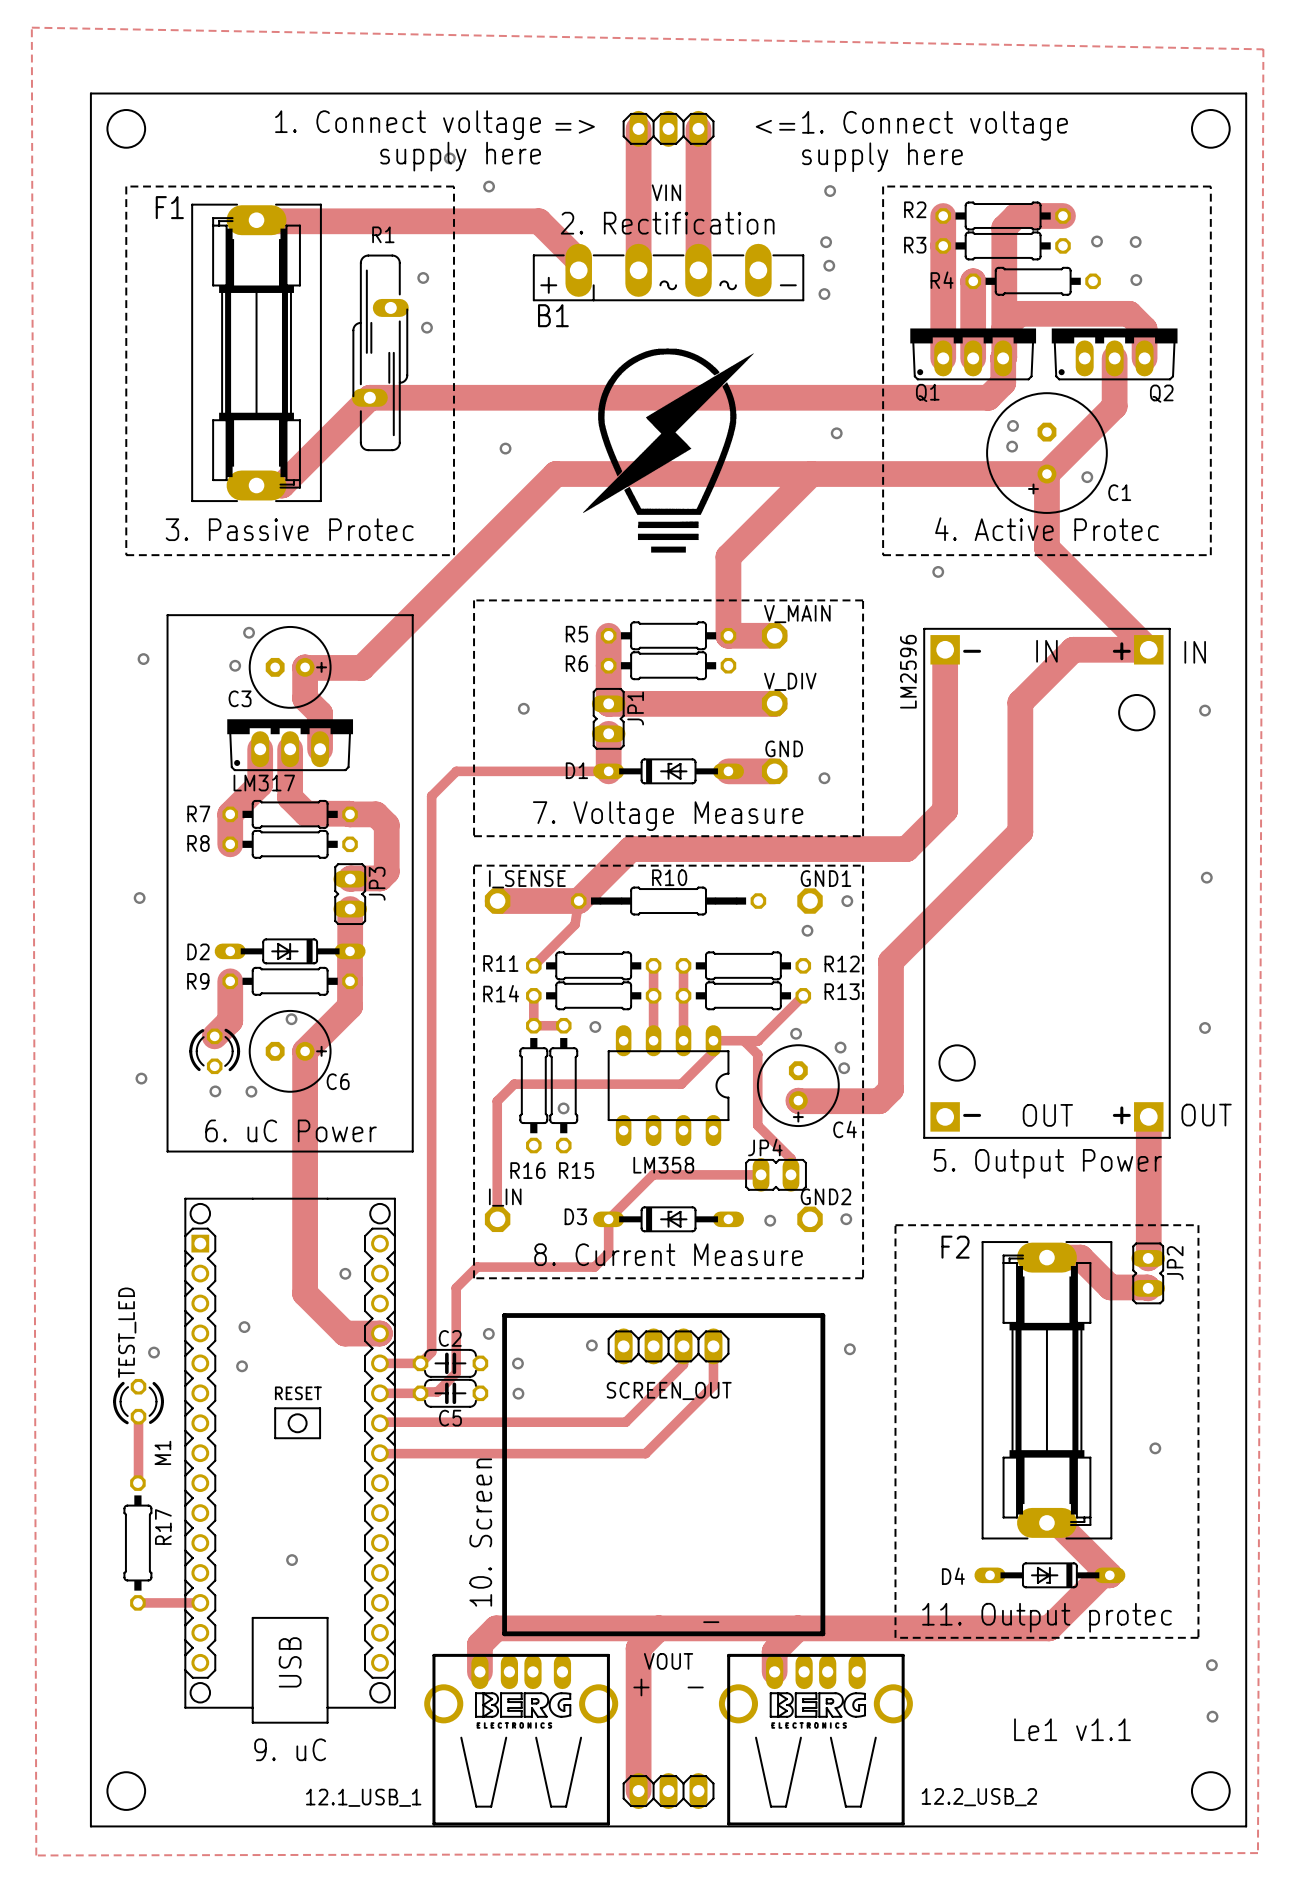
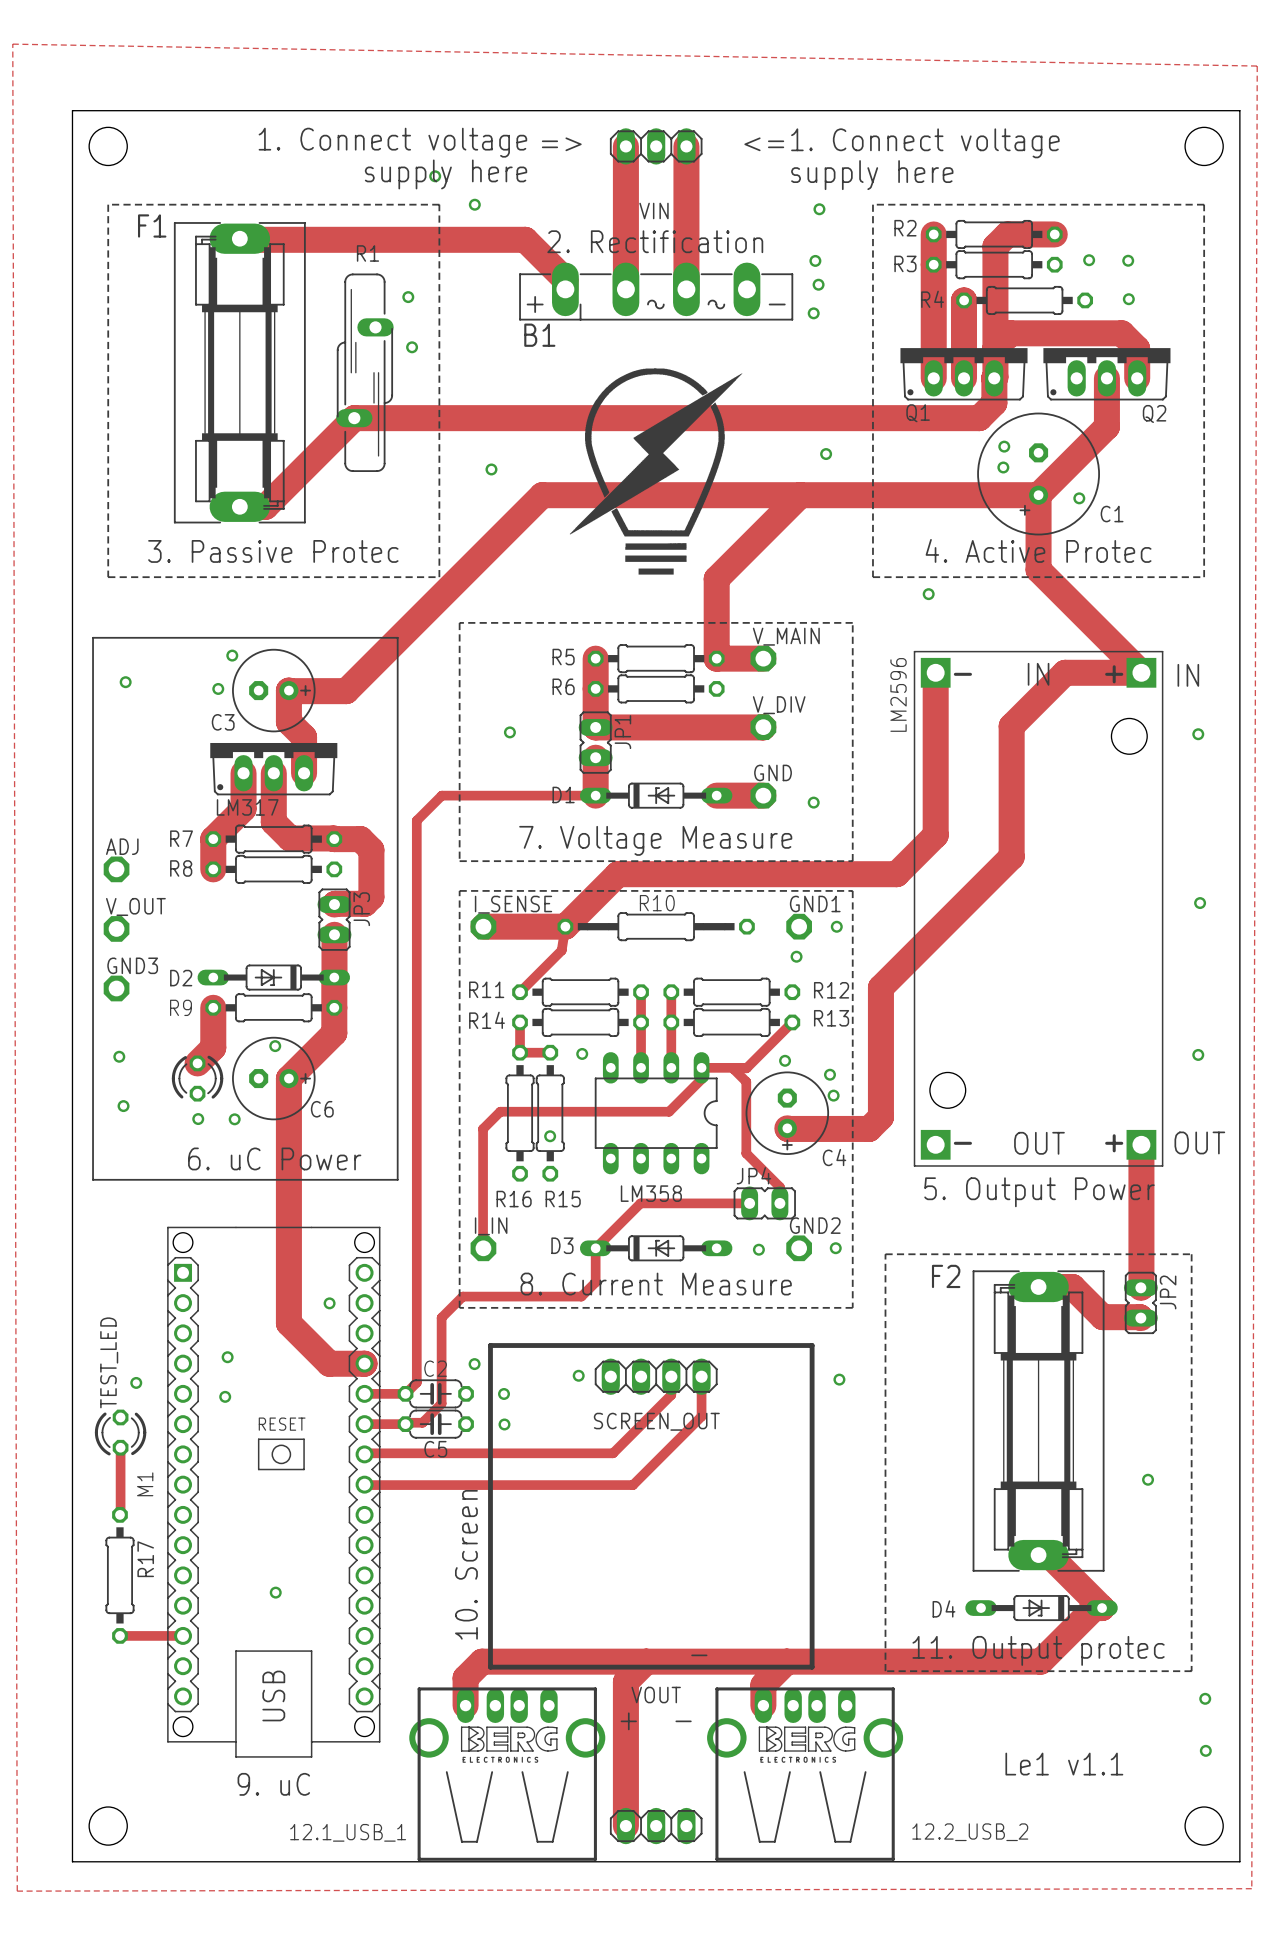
line: (167, 615) (167, 1151) -> (149, 637) (93, 637) (93, 1179) (149, 1179)
ADJ: none -> (116, 869)
via: (139, 898) -> none
V_OUT: none -> (116, 928)
GND3: none -> (116, 988)
via: none -> (119, 1056)

